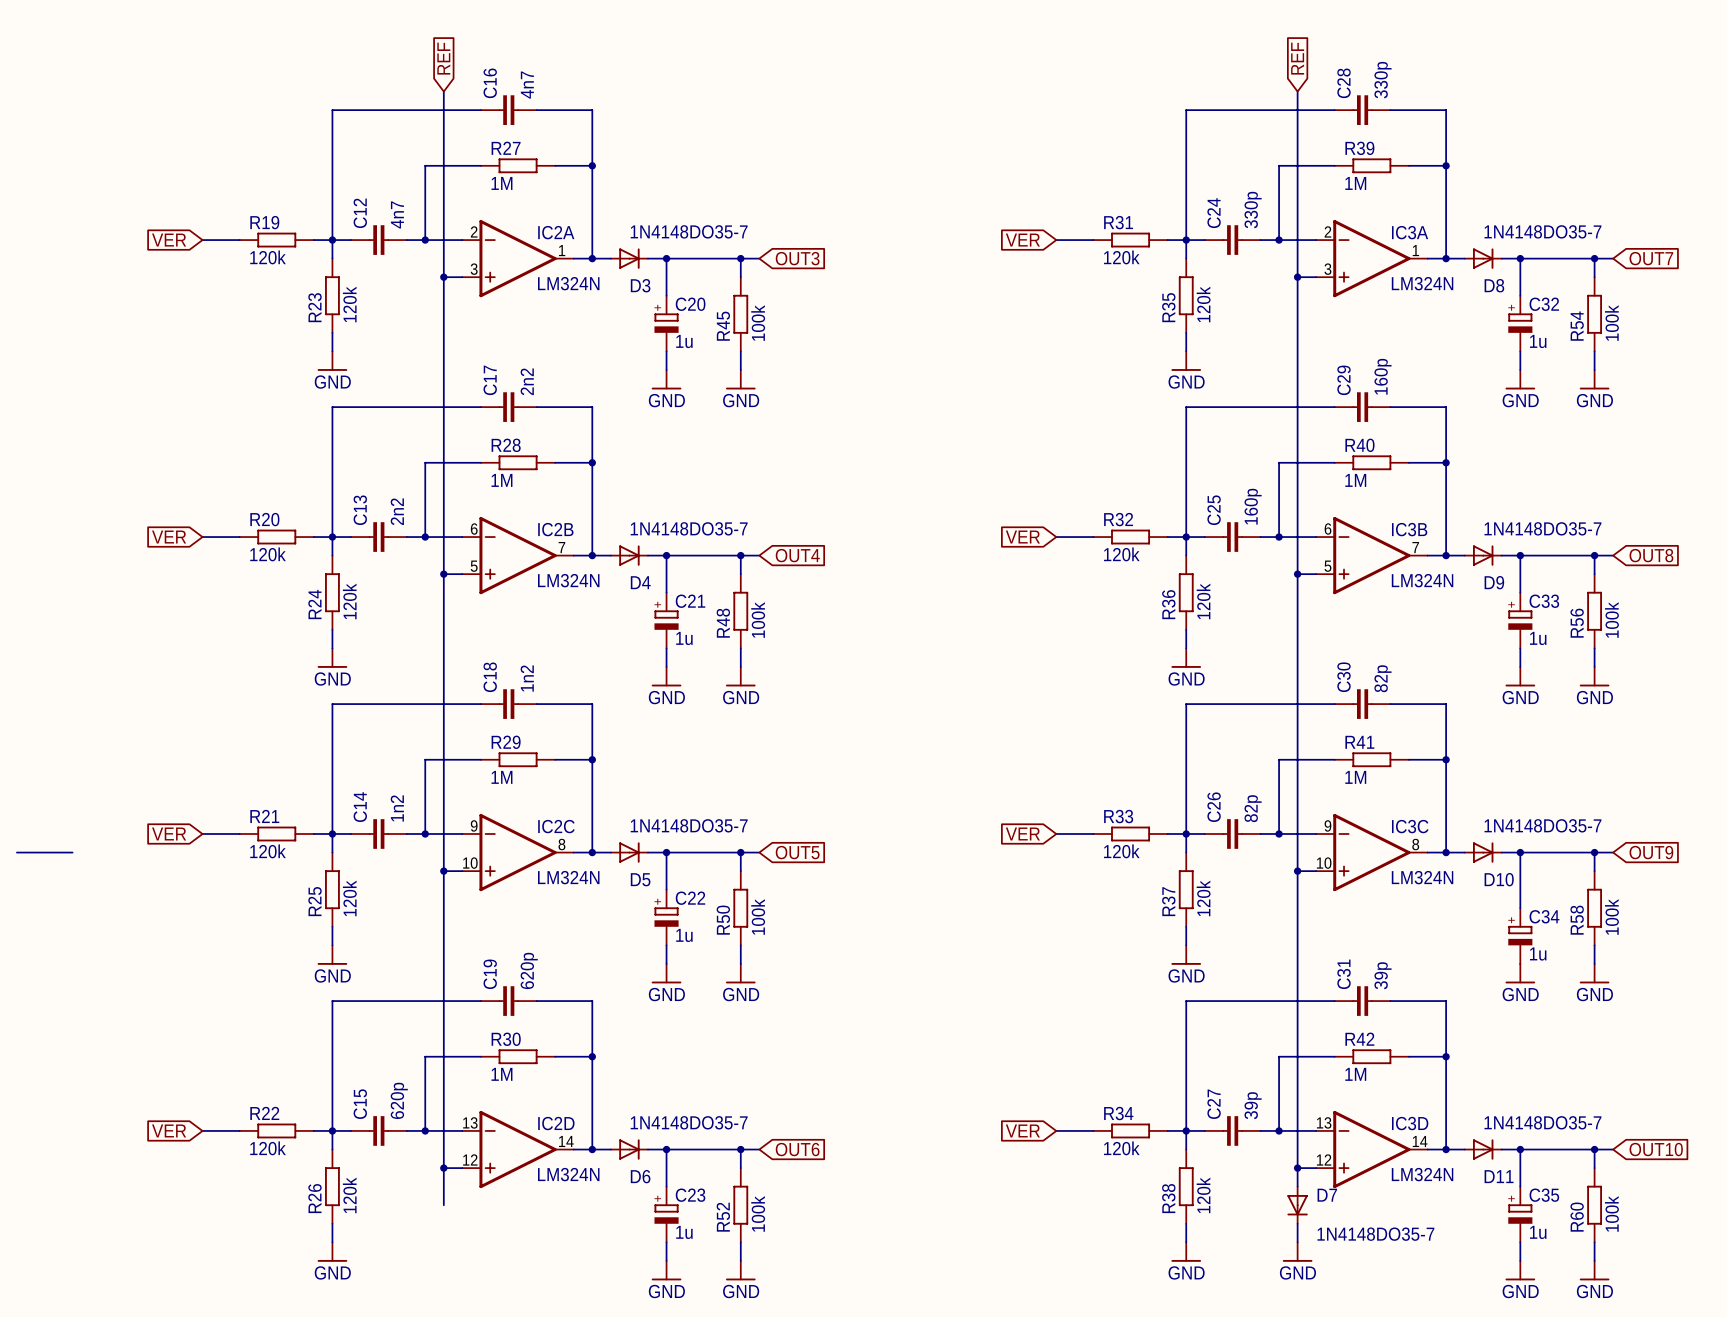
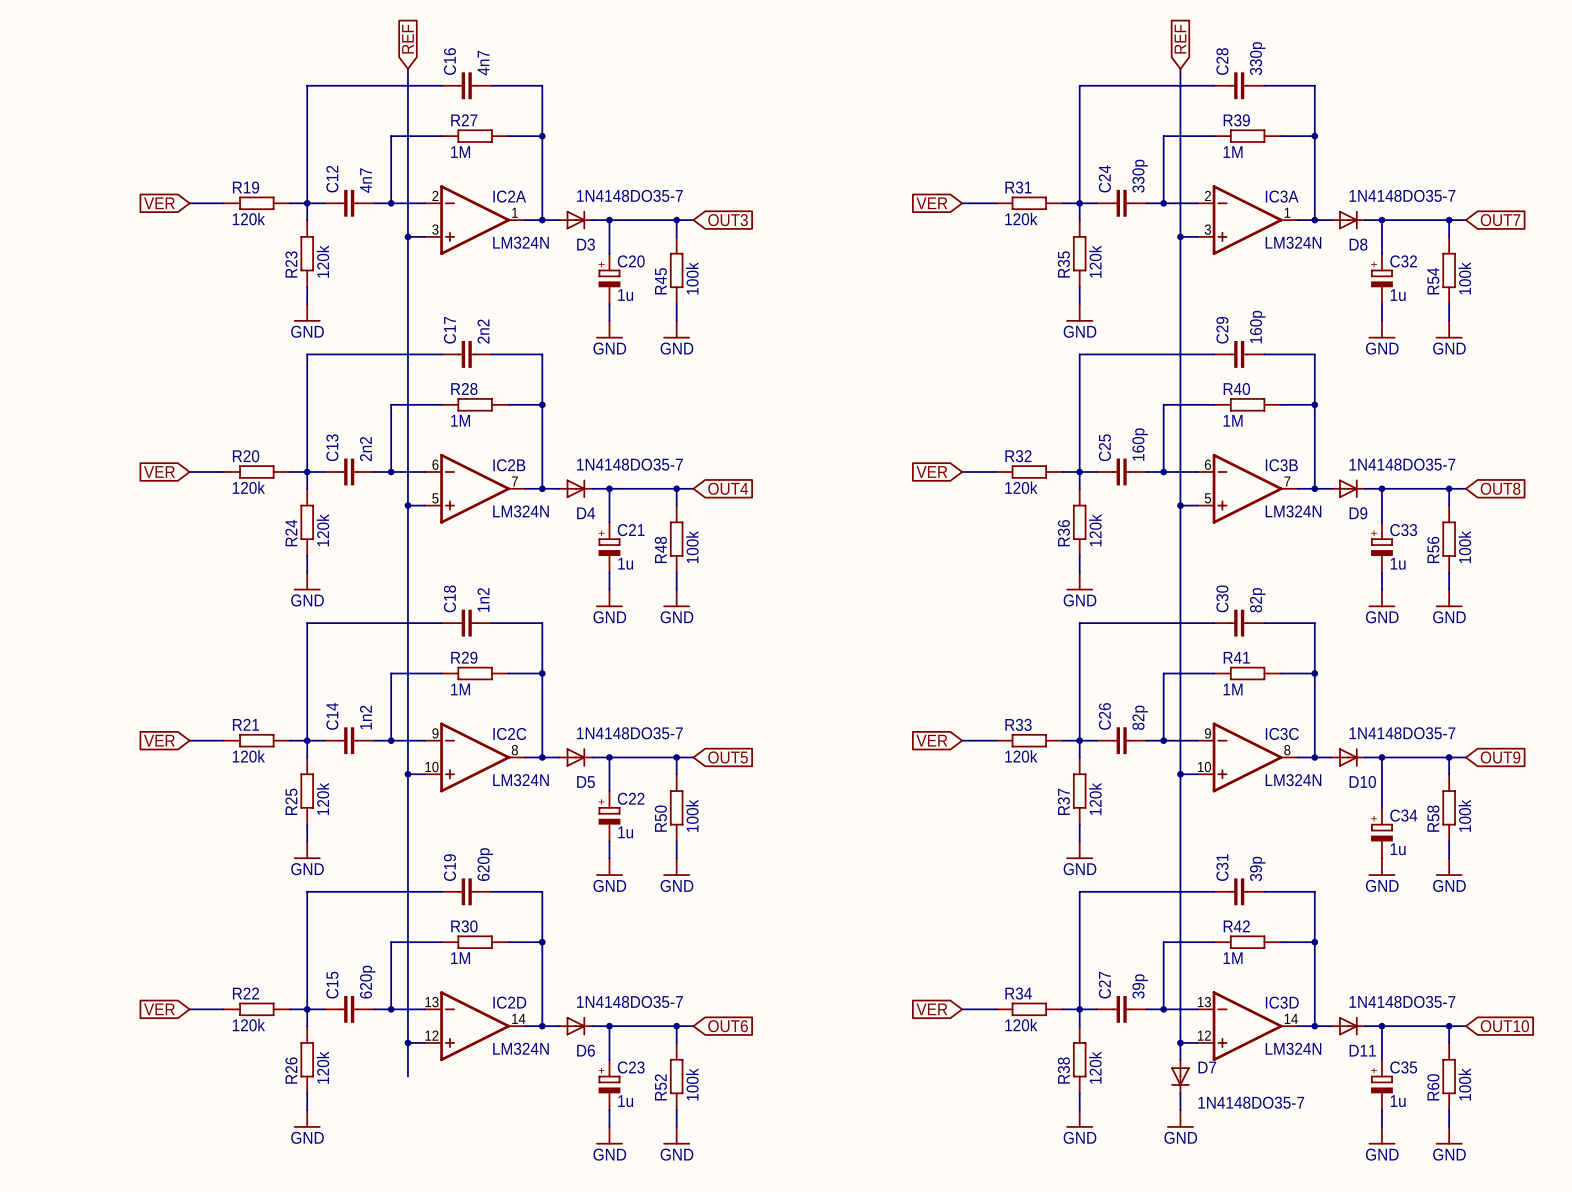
wire: (16, 852) (72, 852) -> none

